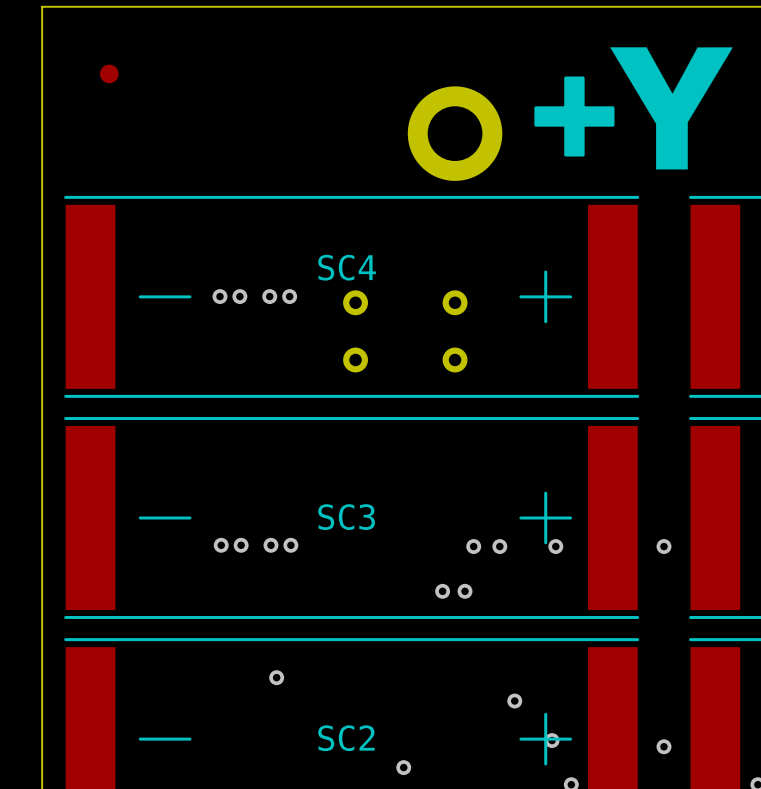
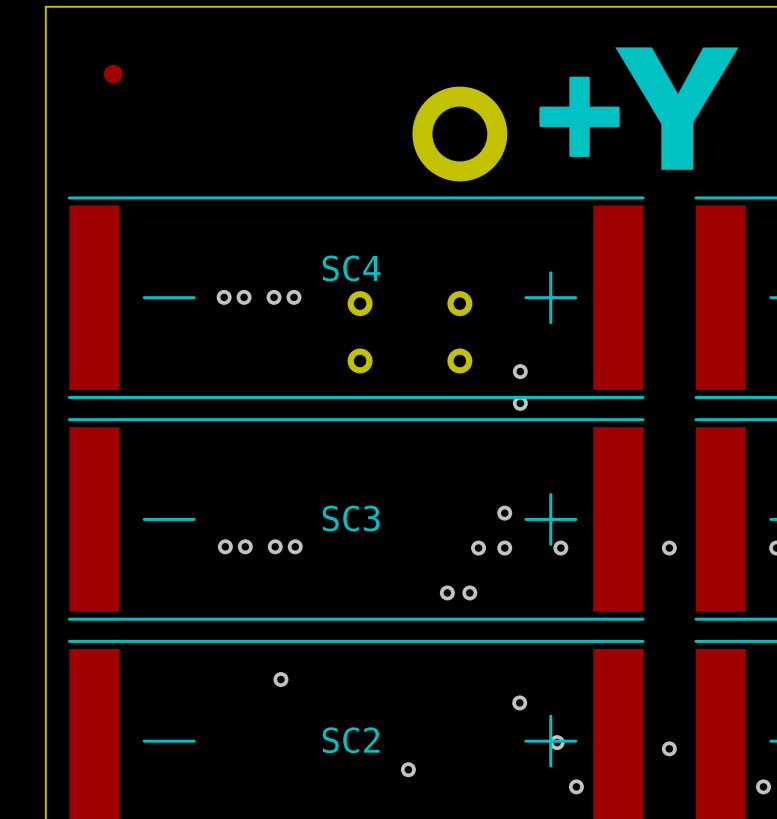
via: none -> (520, 371)
via: none -> (520, 403)
via: none -> (504, 513)

